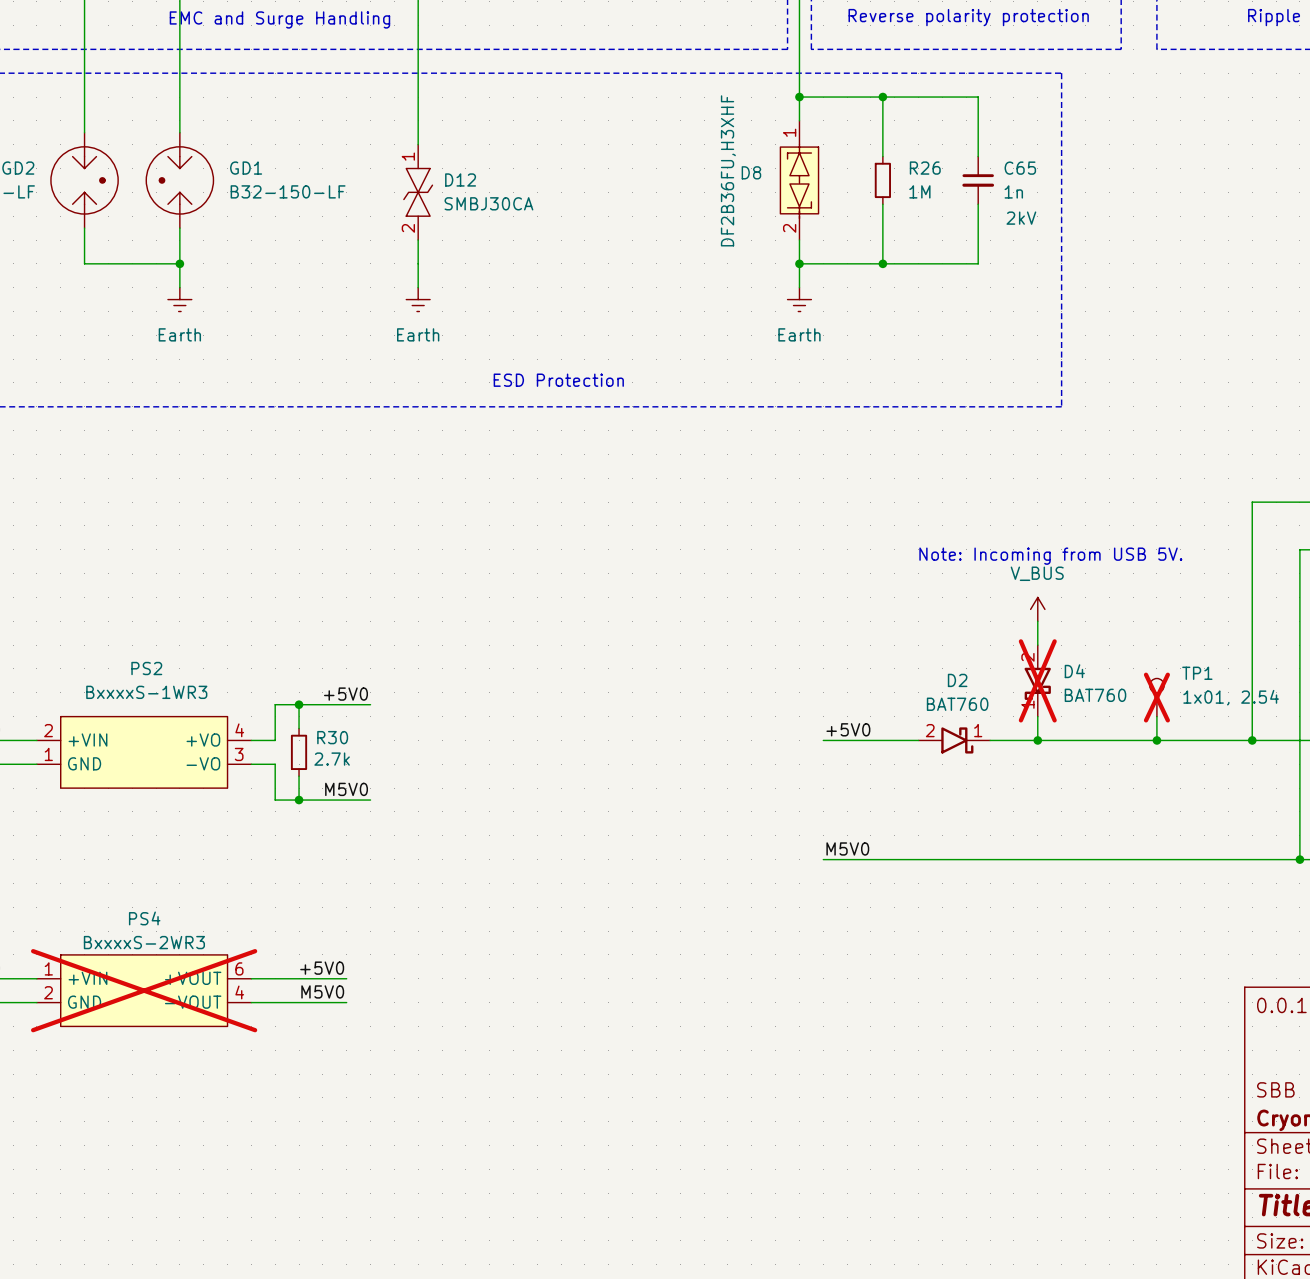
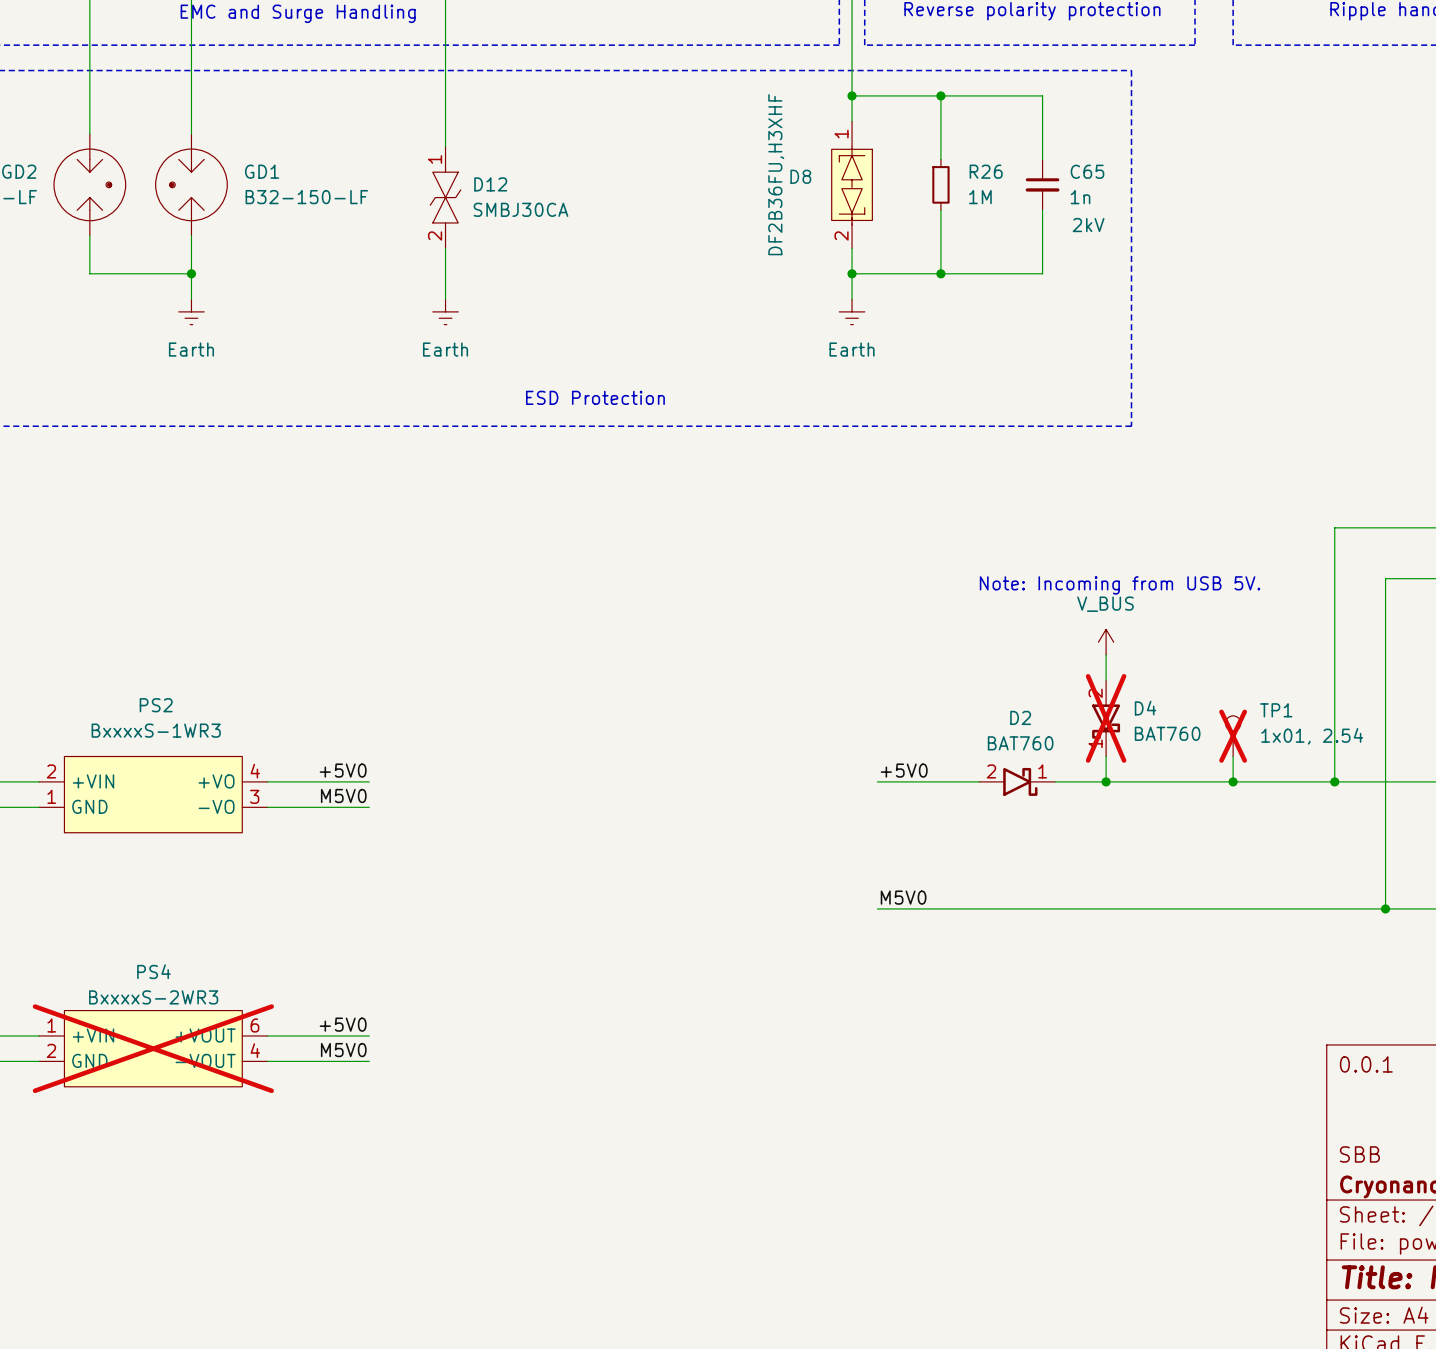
label position: +5V0 (345, 694) -> +5V0 (343, 770)
wire: (299, 704) (299, 728) -> none
junction: (299, 704) -> none
wire: (370, 704) (275, 704) (275, 740) -> (369, 781) (293, 781)
R30: 2.7k (299, 752) -> none
wire: (275, 764) (275, 800) (370, 800) -> (293, 807) (369, 807)
wire: (299, 776) (299, 800) -> none
label position: M5V0 (346, 789) -> M5V0 (343, 795)
junction: (299, 800) -> none

